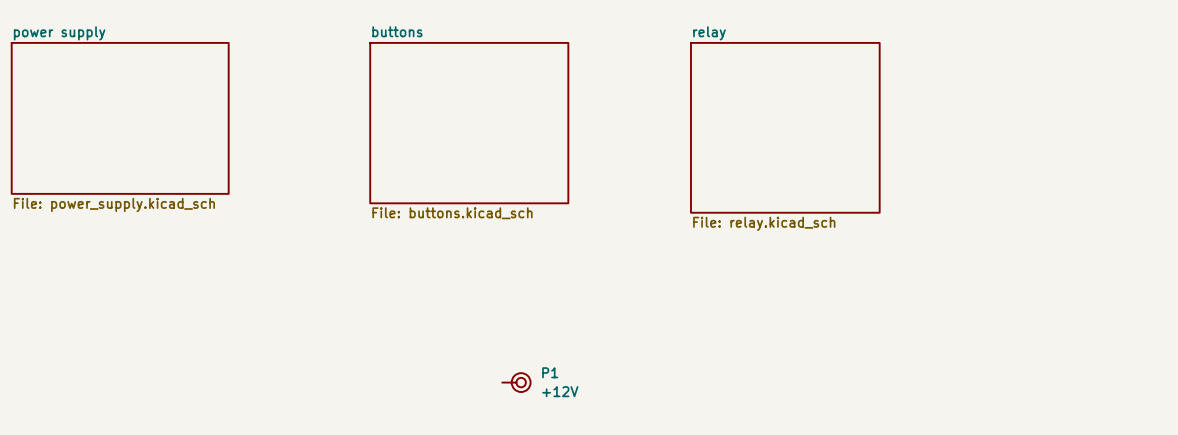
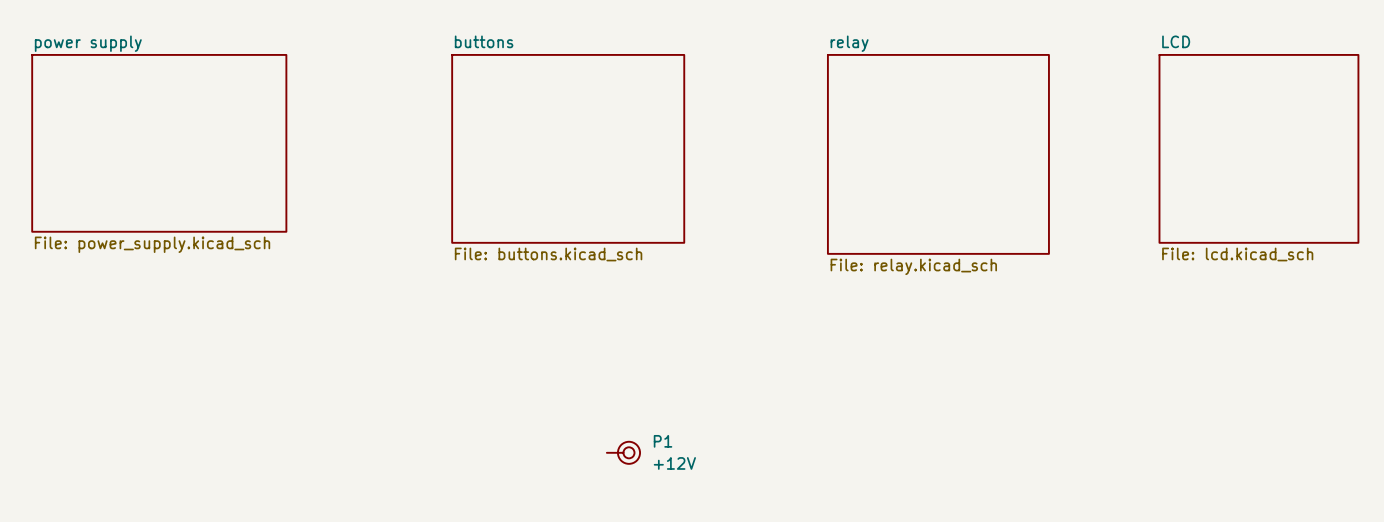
sheet LCD: none -> File: lcd.kicad_sch (1258, 148)

